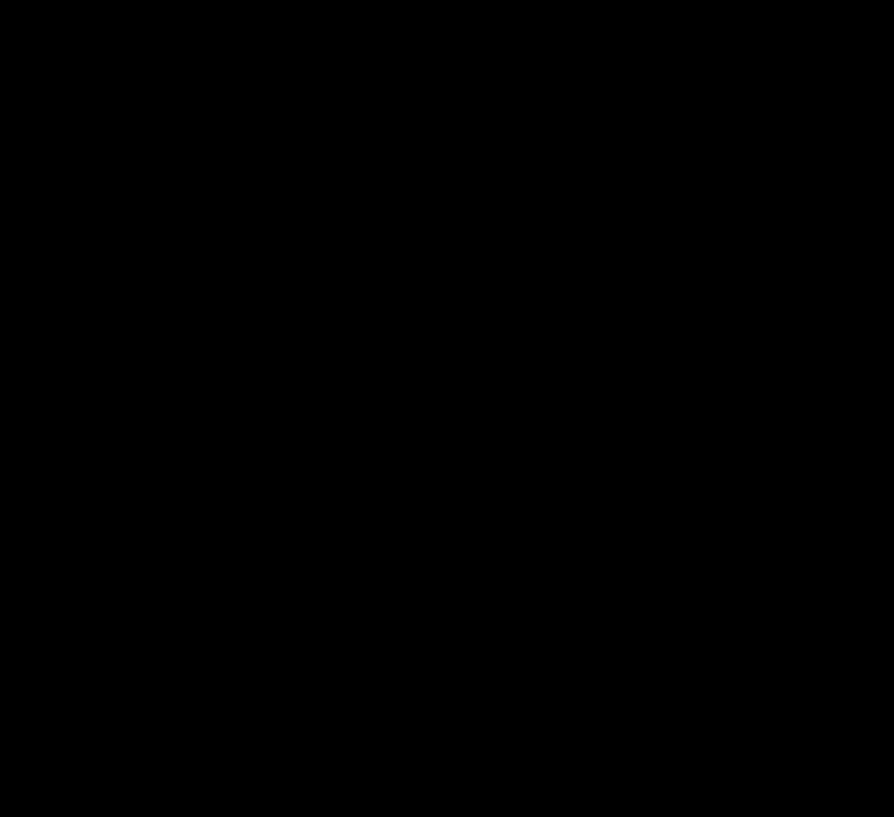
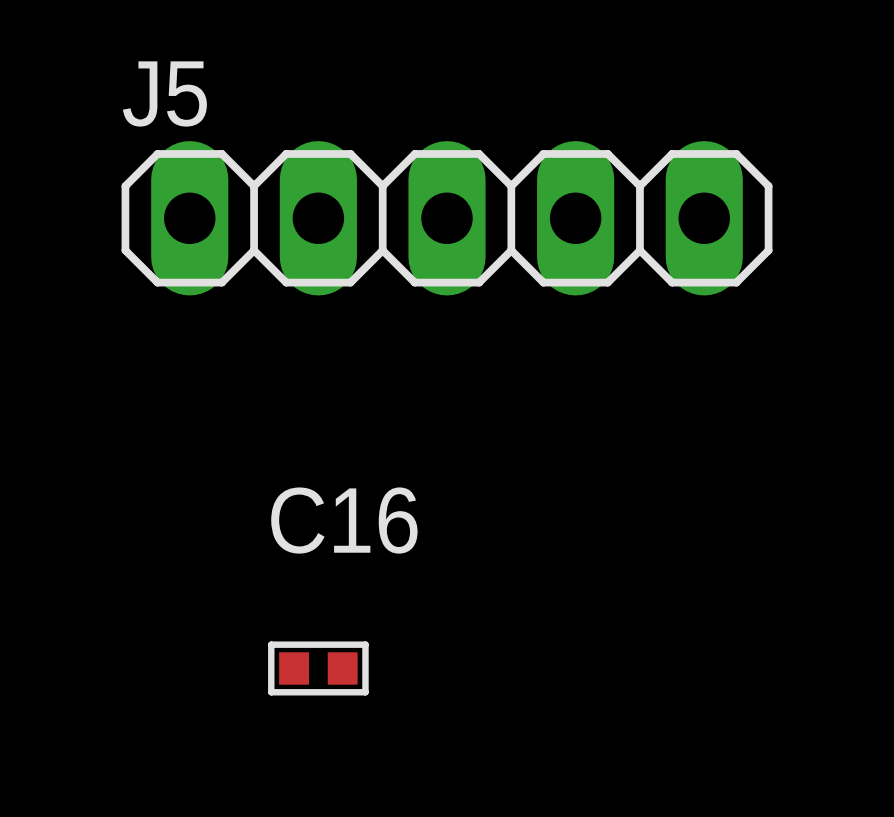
J5: none -> (447, 218)
C16: none -> (318, 668)

